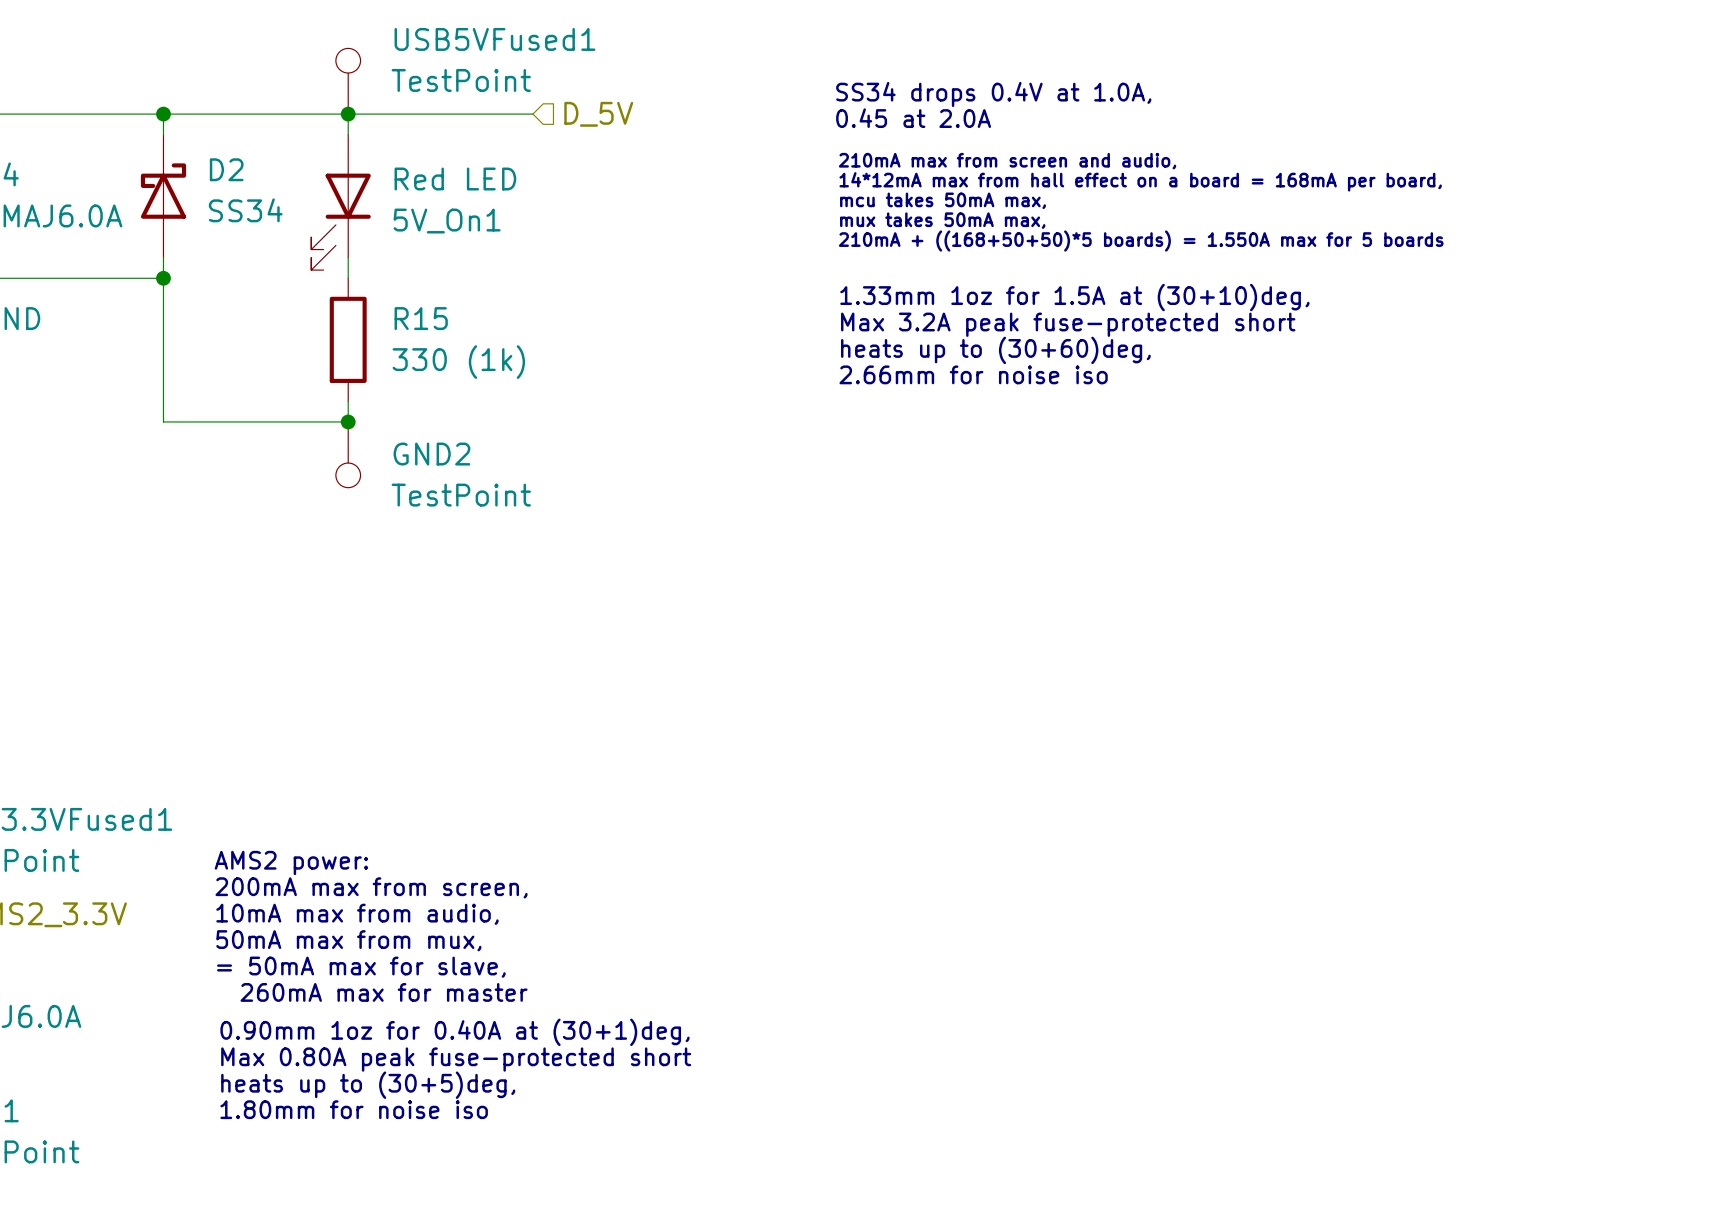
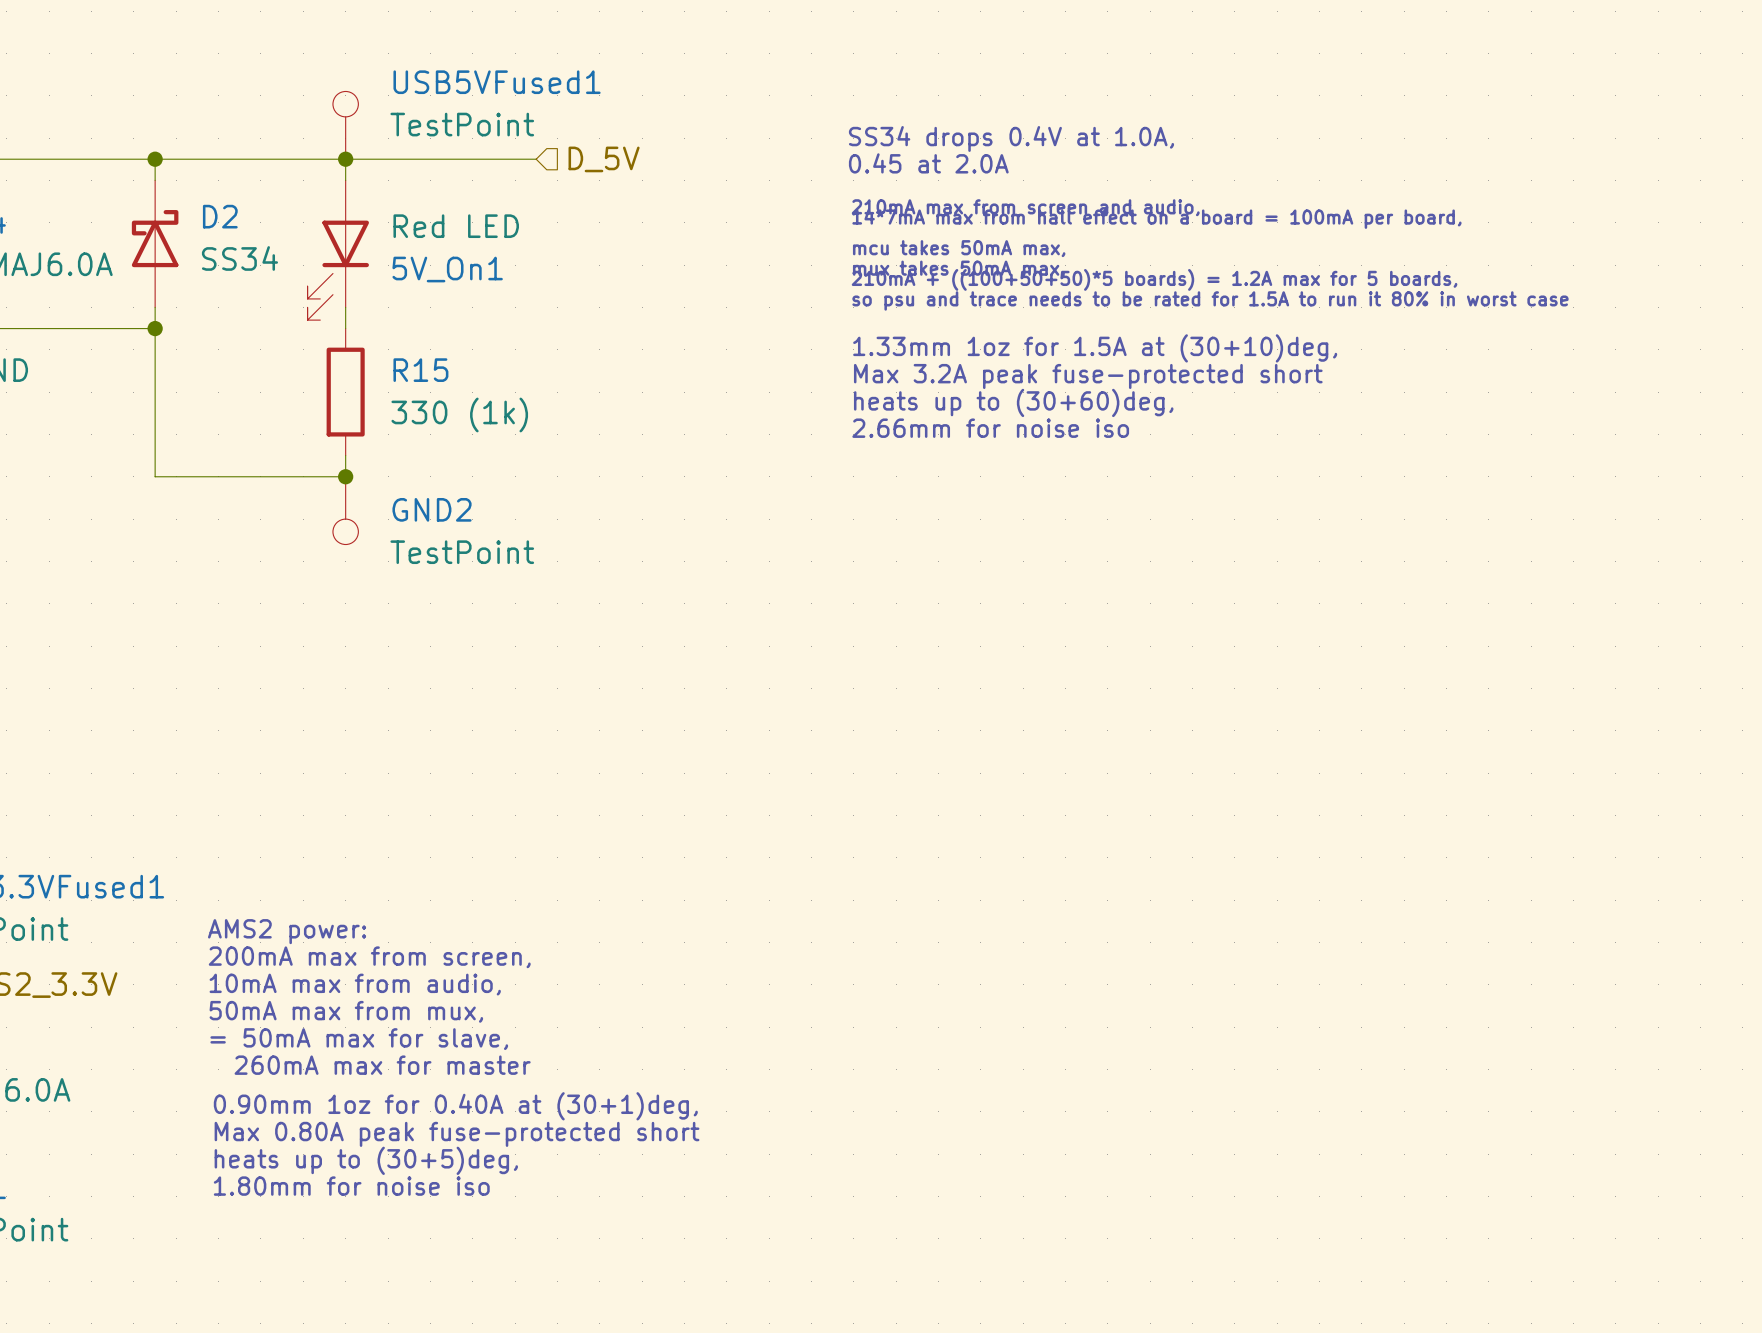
text: 14*12mA max from hall effect on a board = 168mA per board, (1140, 181) -> 14*7mA max from hall effect on a board = 100mA per board, (1156, 218)
text: 210mA + ((168+50+50)*5 boards) = 1.550A max for 5 boards (1141, 241) -> 210mA + ((100+50+50)*5 boards) = 1.2A max for 5 boards, (1154, 279)
text: none -> so psu and trace needs to be rated for 1.5A to run it 80% in worst case (1210, 300)

